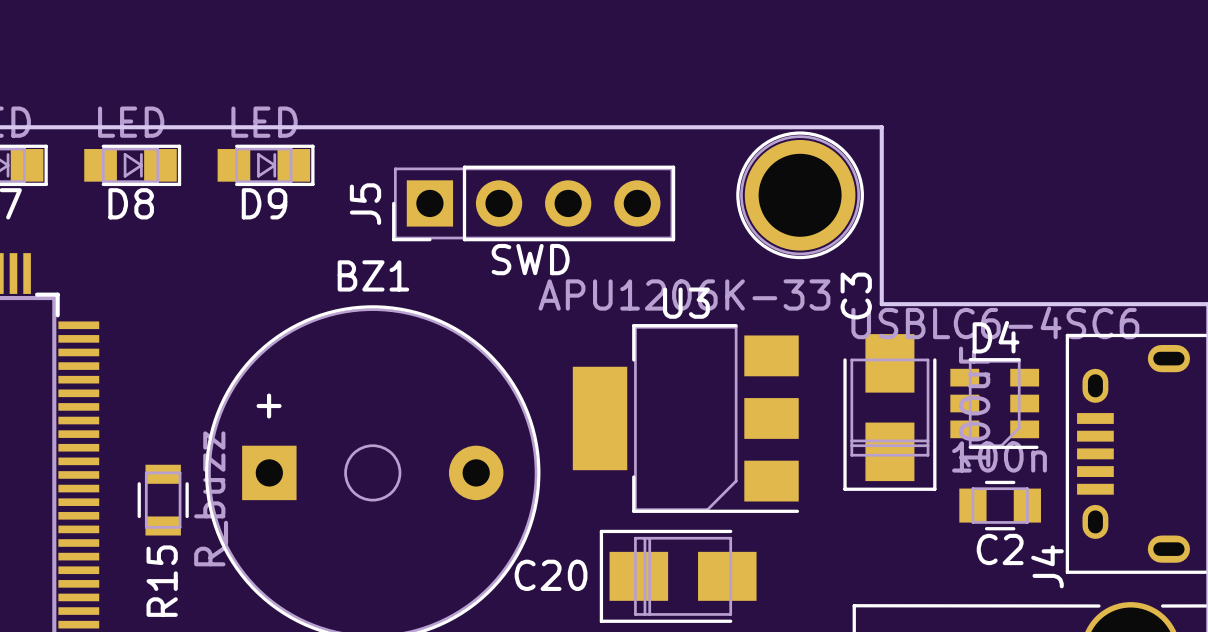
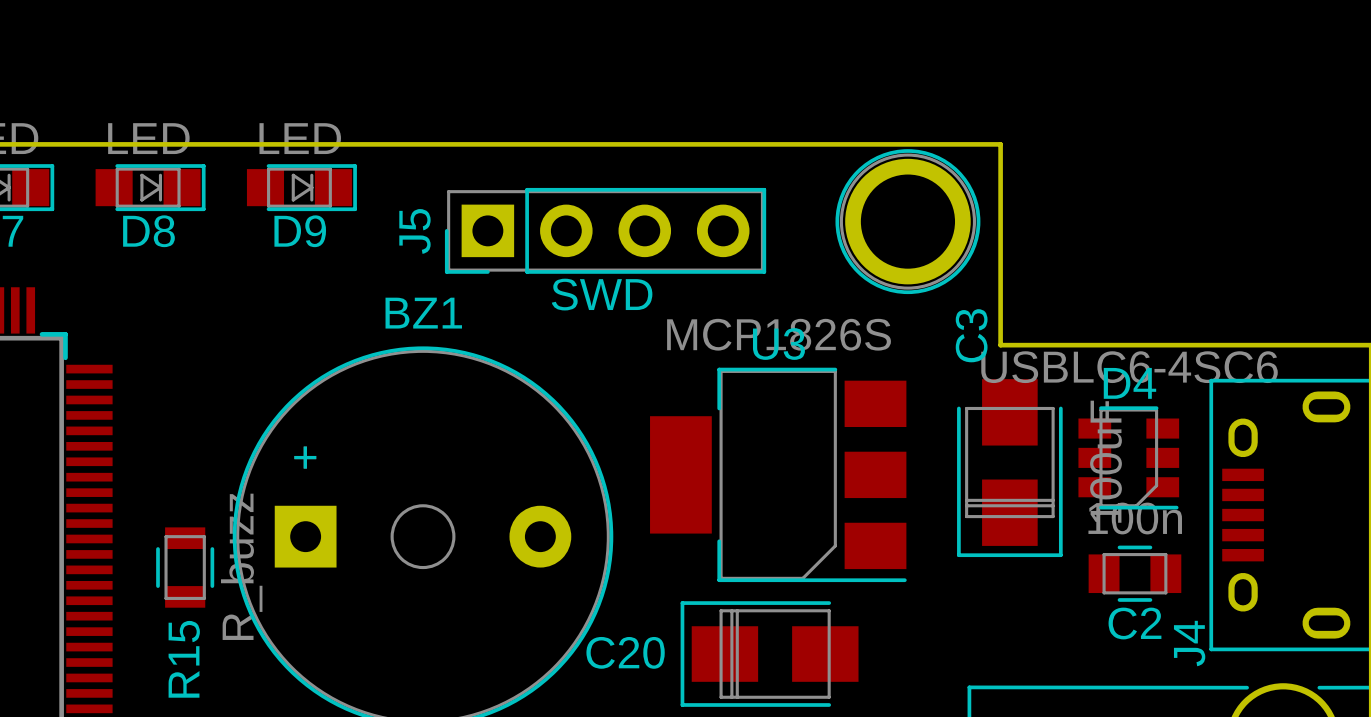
U3 value: APU1206K-33 (684, 294) -> MCP1826S (779, 334)

